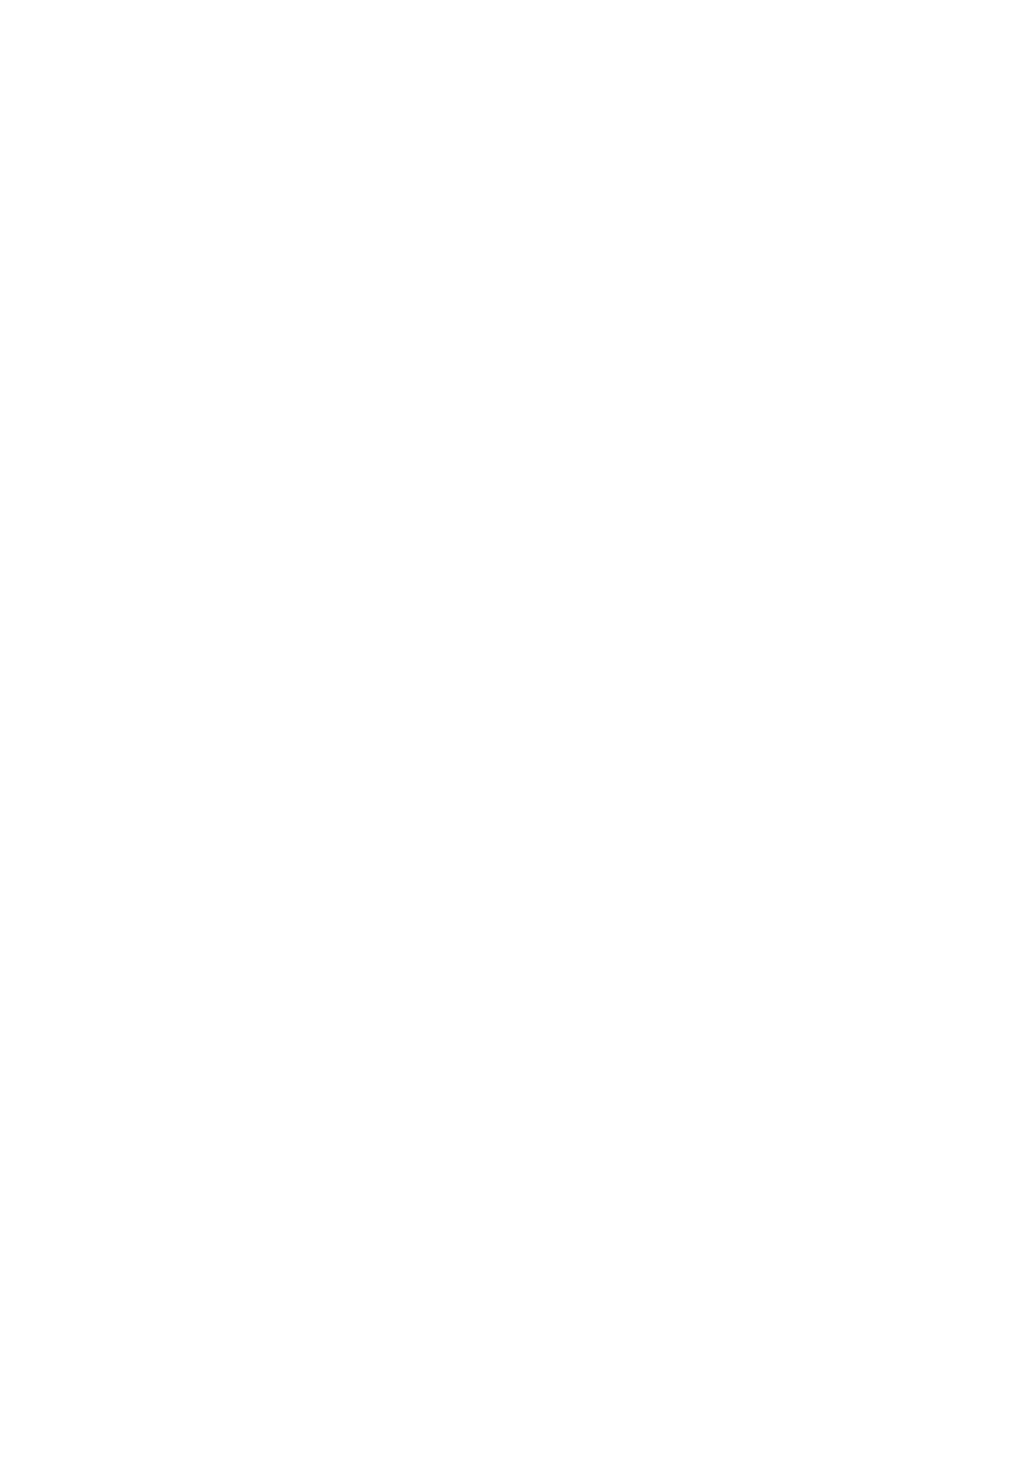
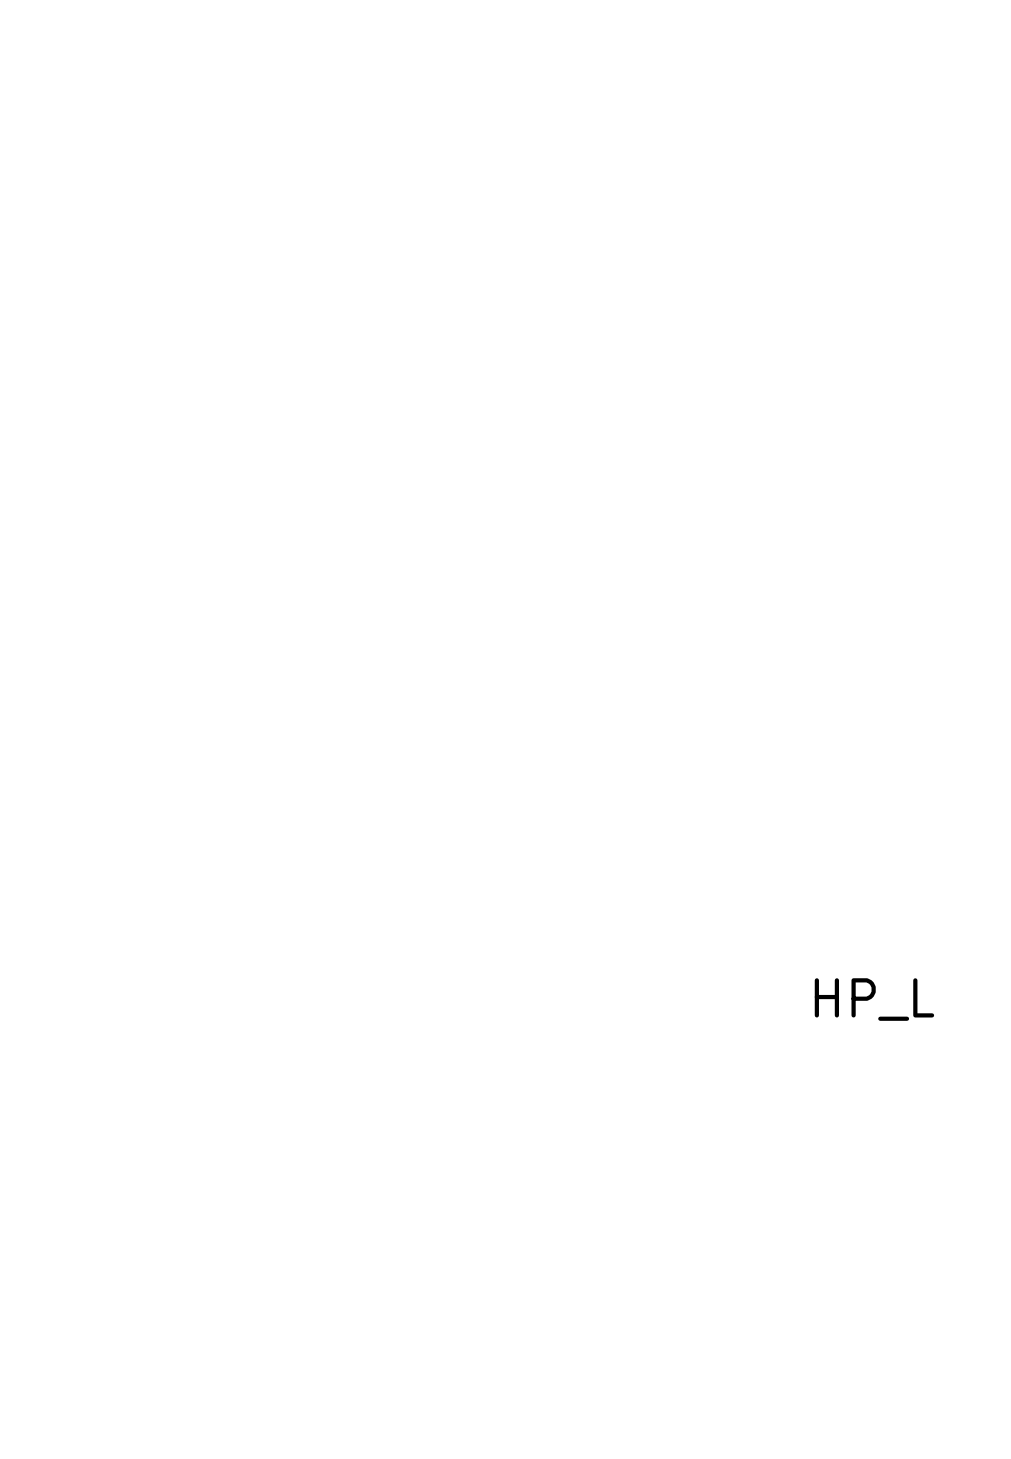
label: none -> HP_L (874, 999)

